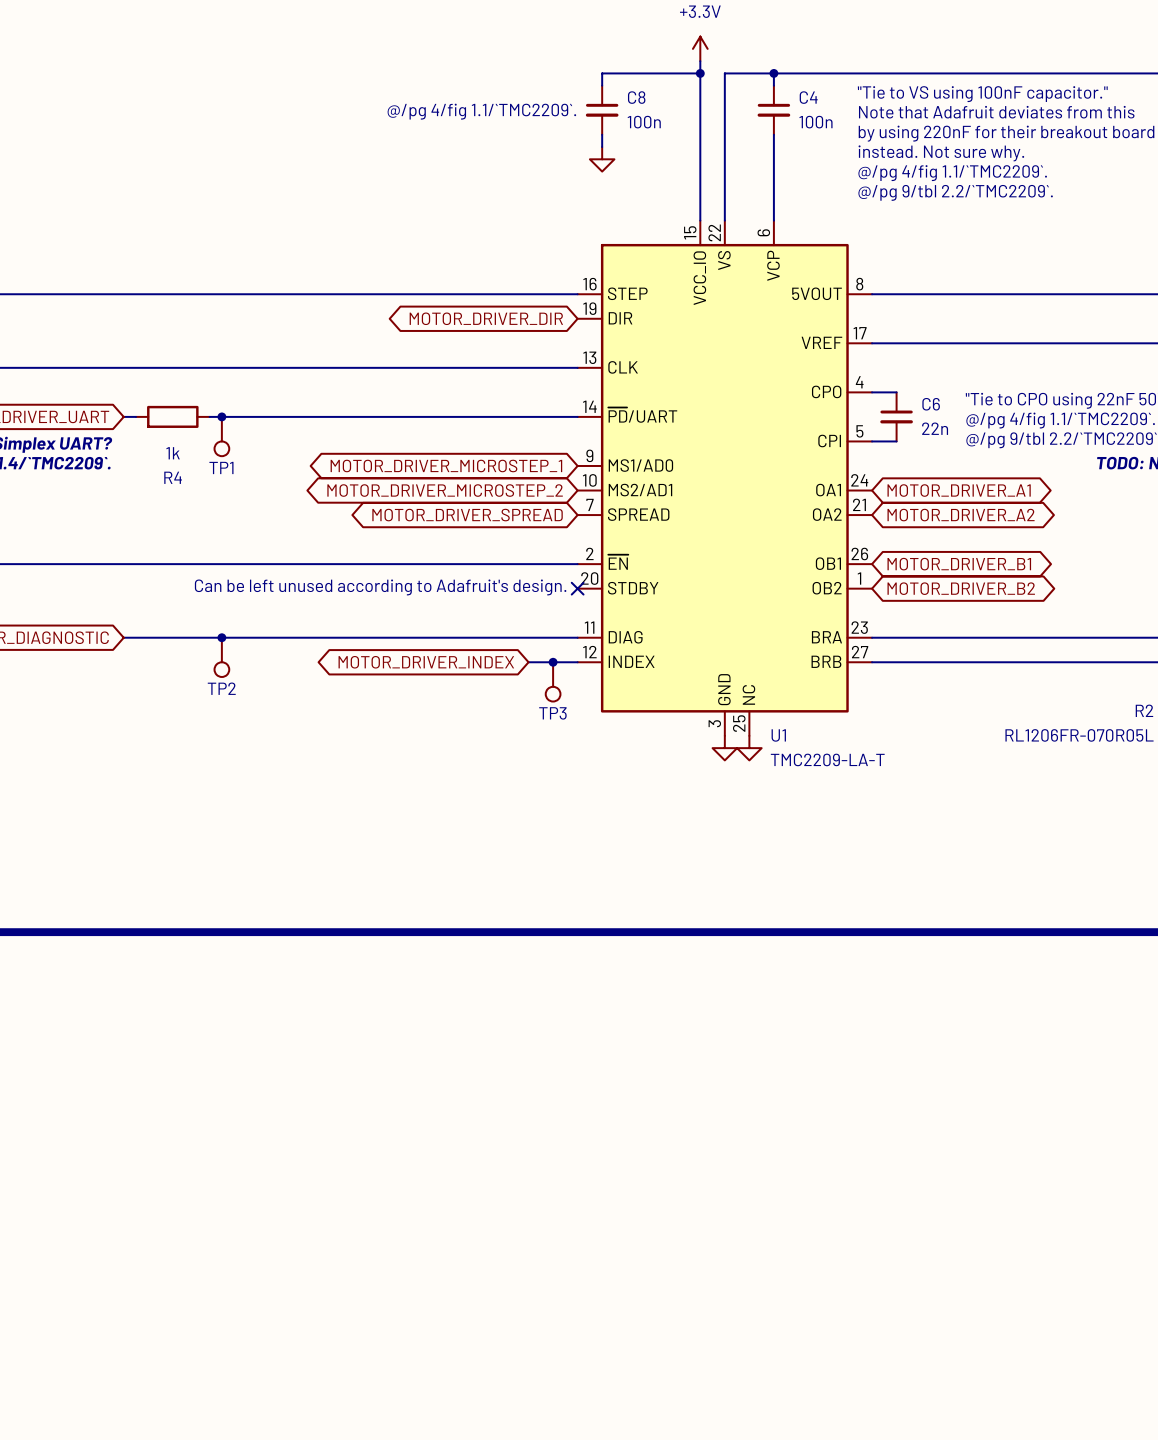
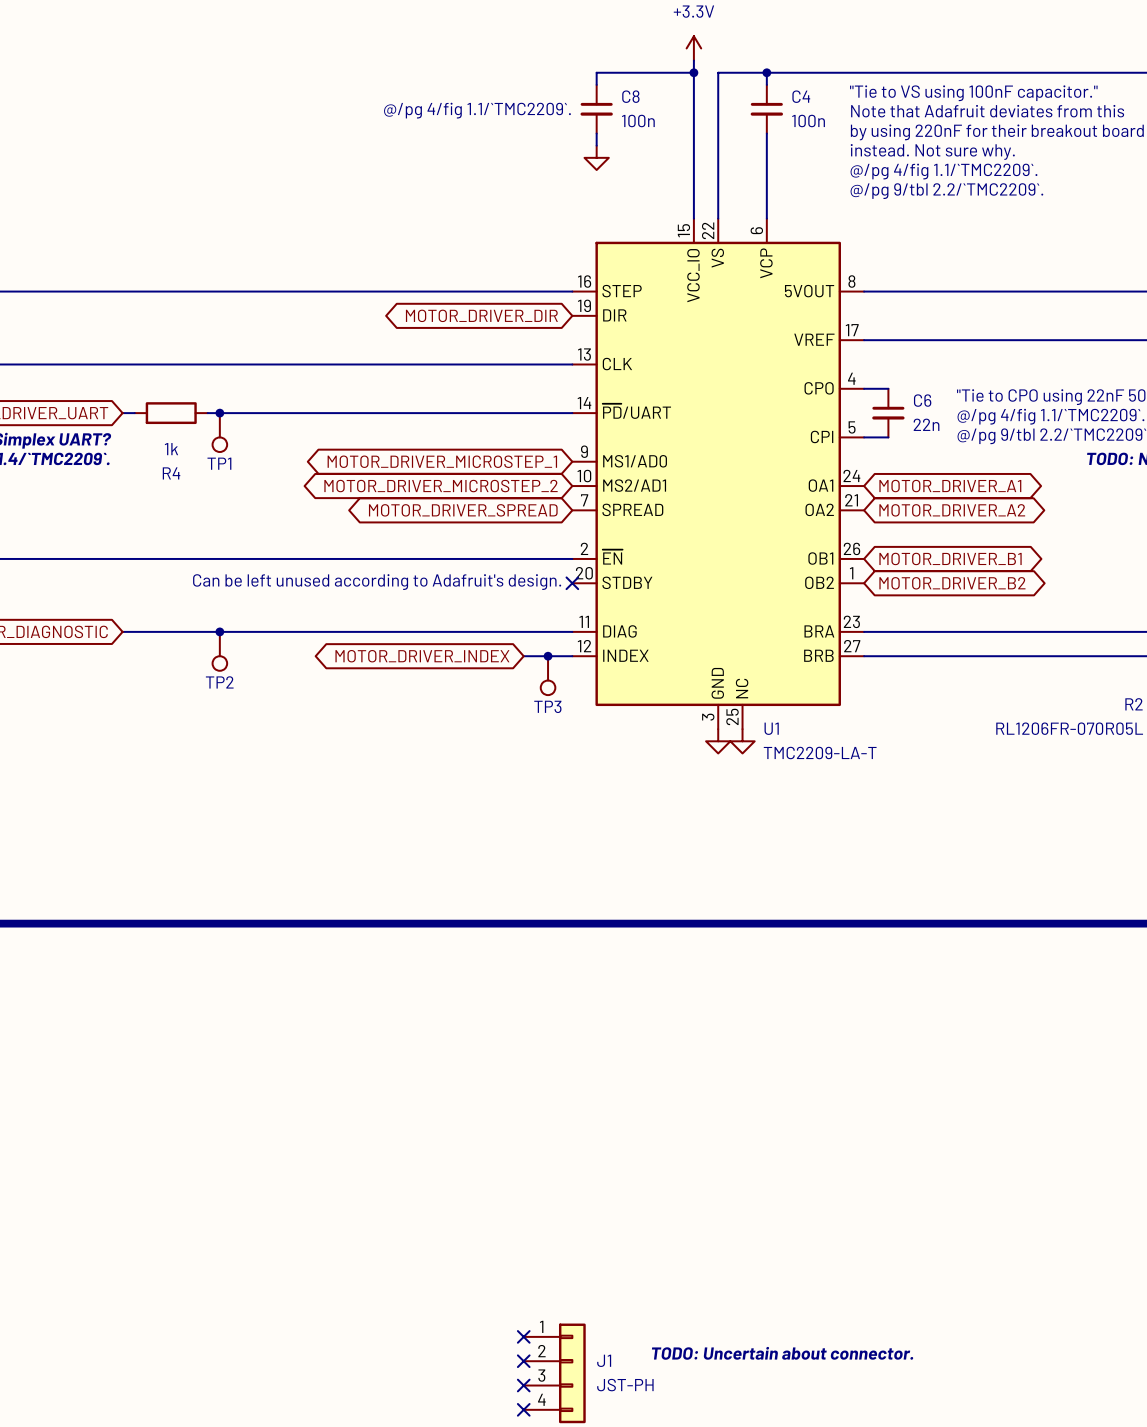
no-connect mark: none -> (523, 1336)
text: none -> TODO: Uncertain about connector. (782, 1353)
no-connect mark: none -> (523, 1361)
J1: none -> JST-PH (554, 1373)
no-connect mark: none -> (523, 1385)
no-connect mark: none -> (523, 1409)

